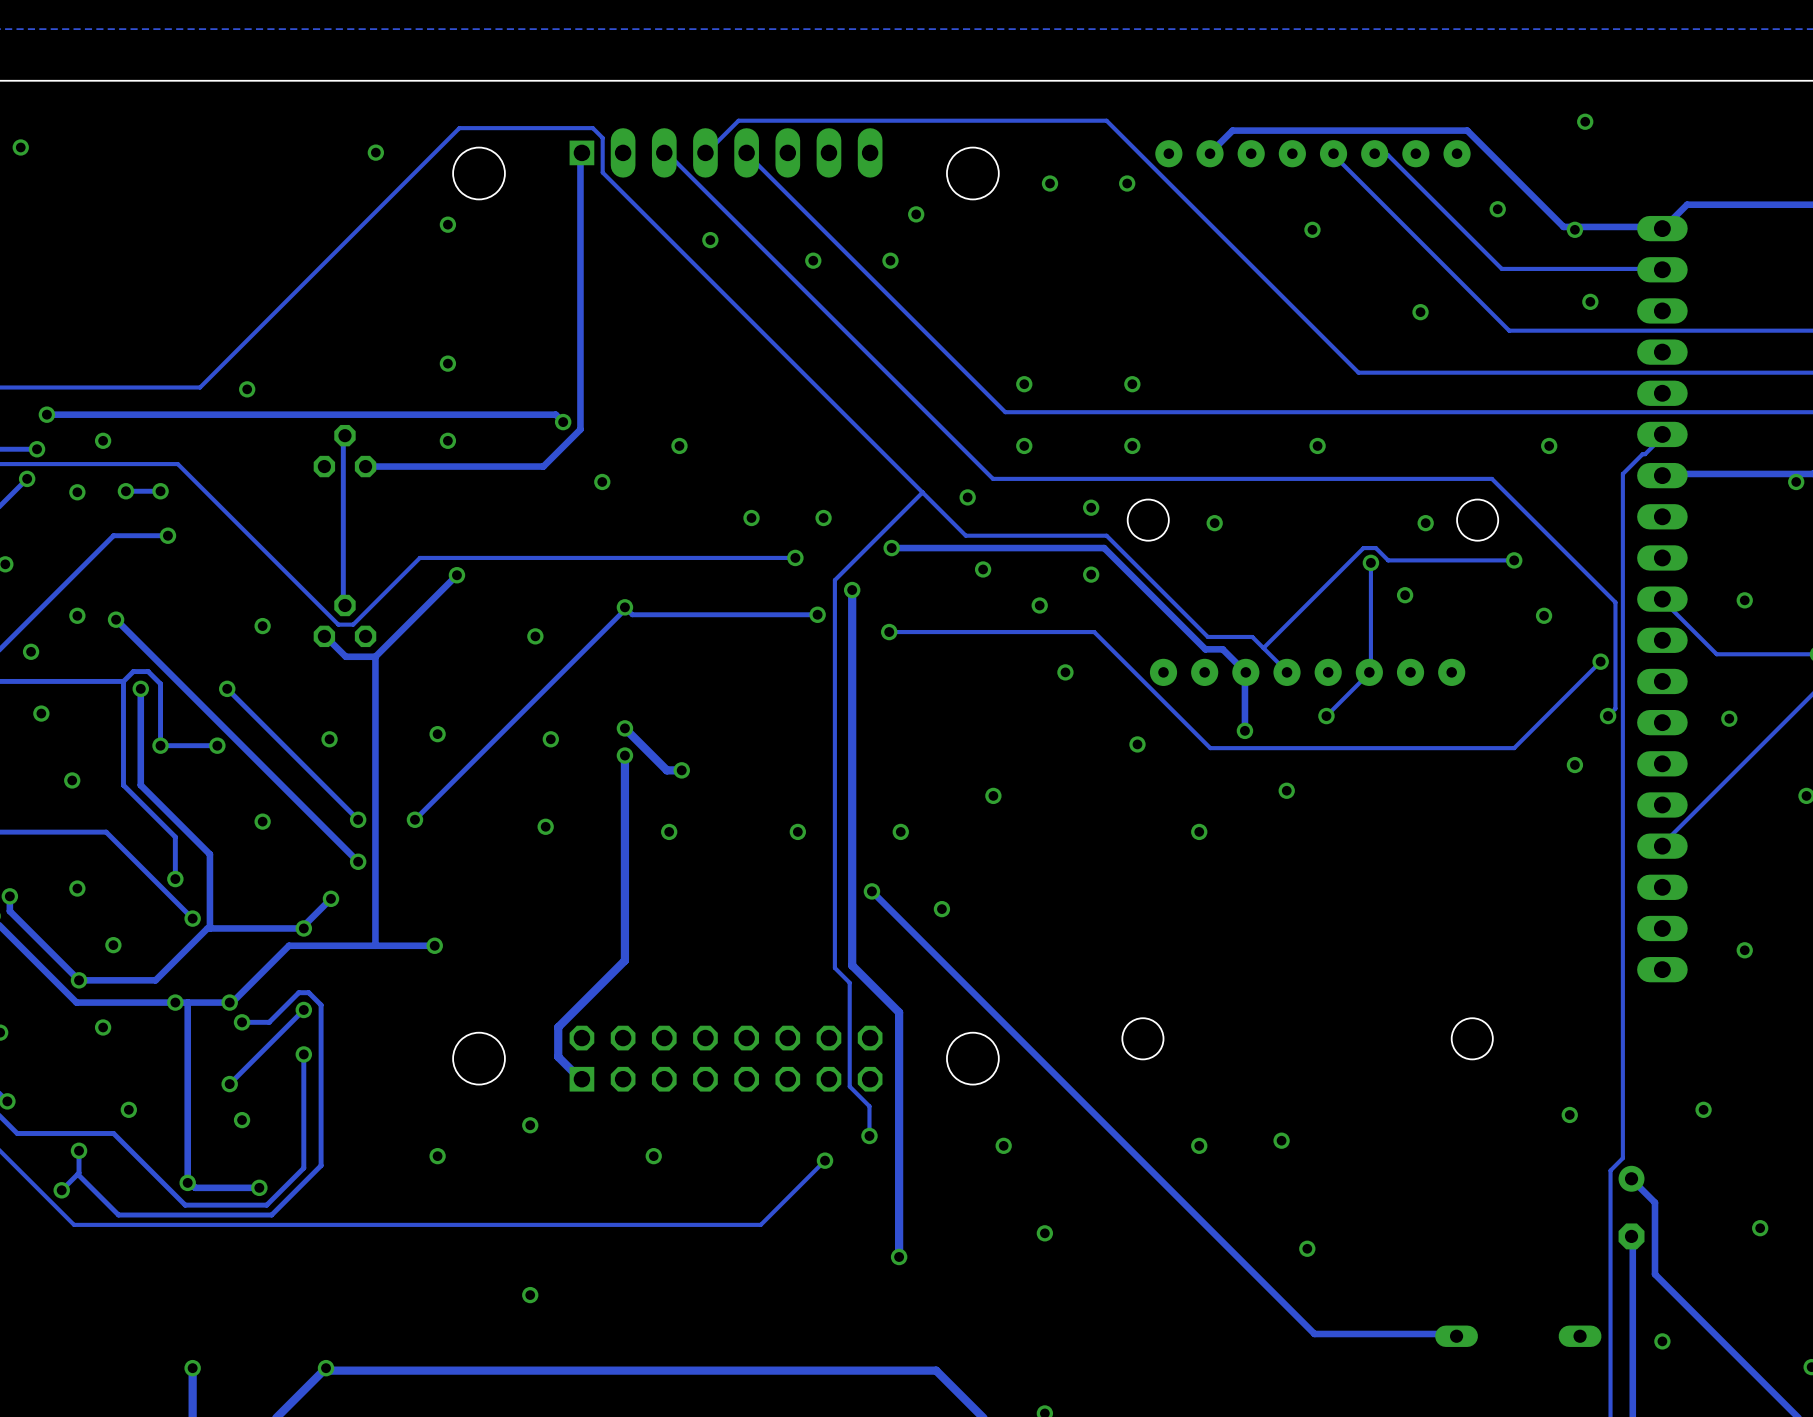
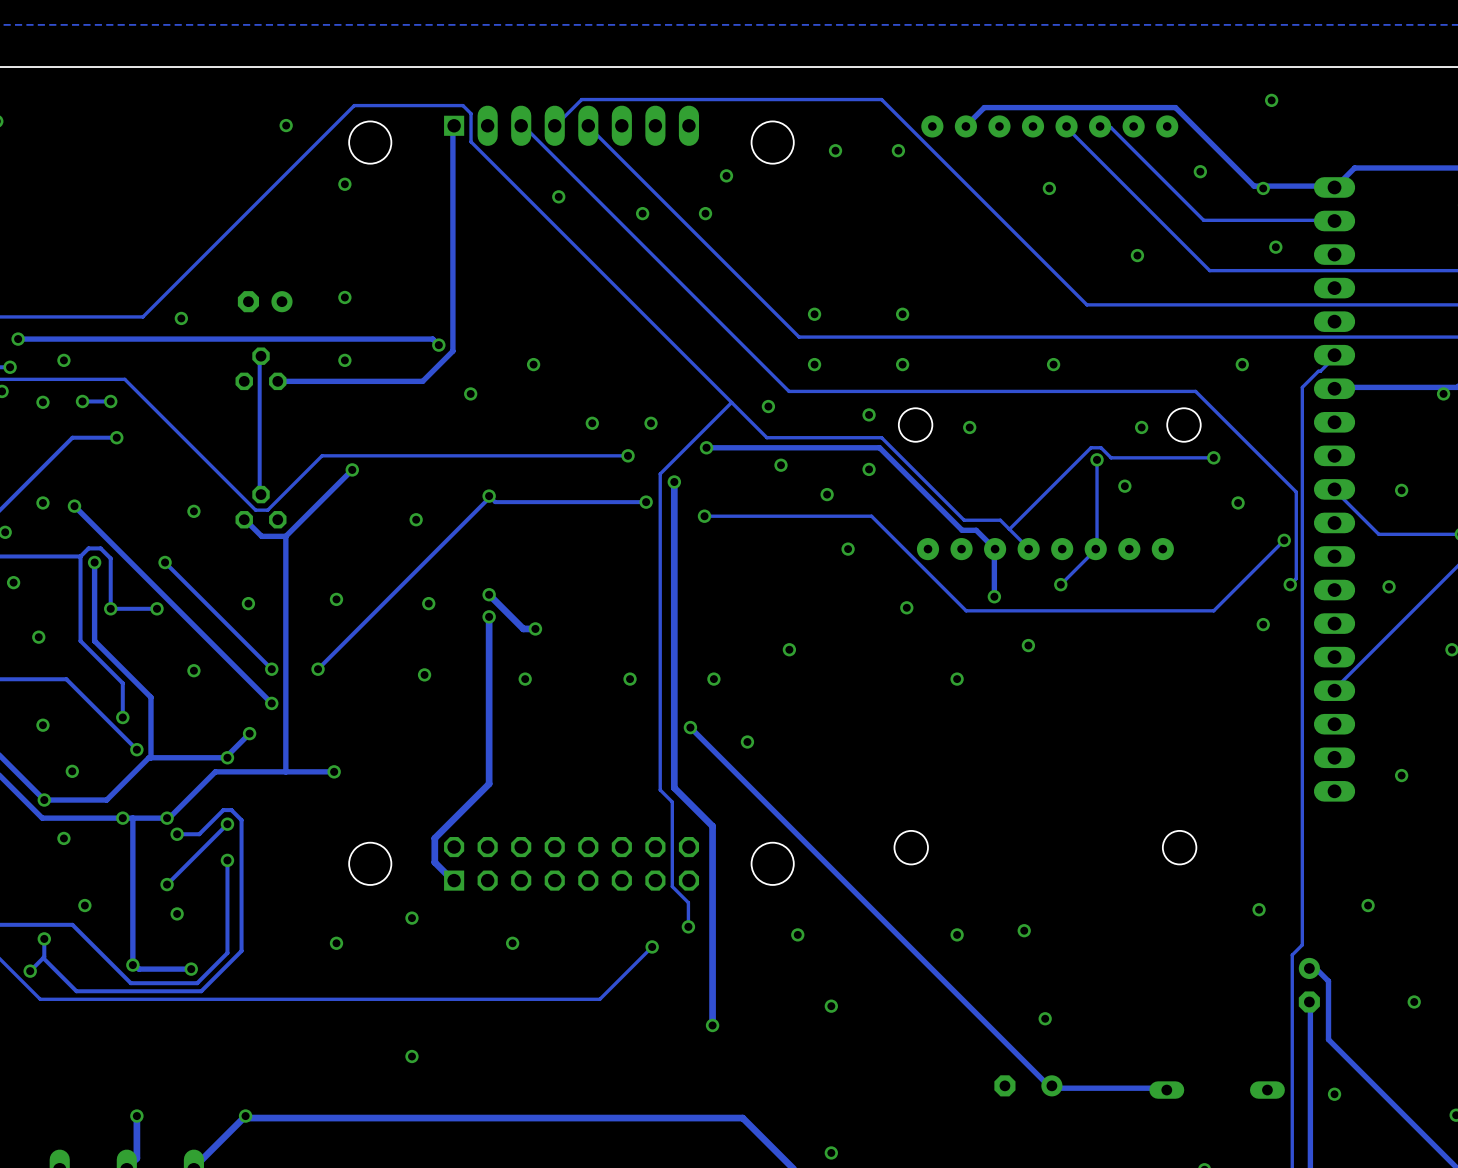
part: none -> (265, 301)
part footprint: [1618, 1165, 1645, 1250] -> [1298, 957, 1320, 1013]
part: none -> (1028, 1085)

